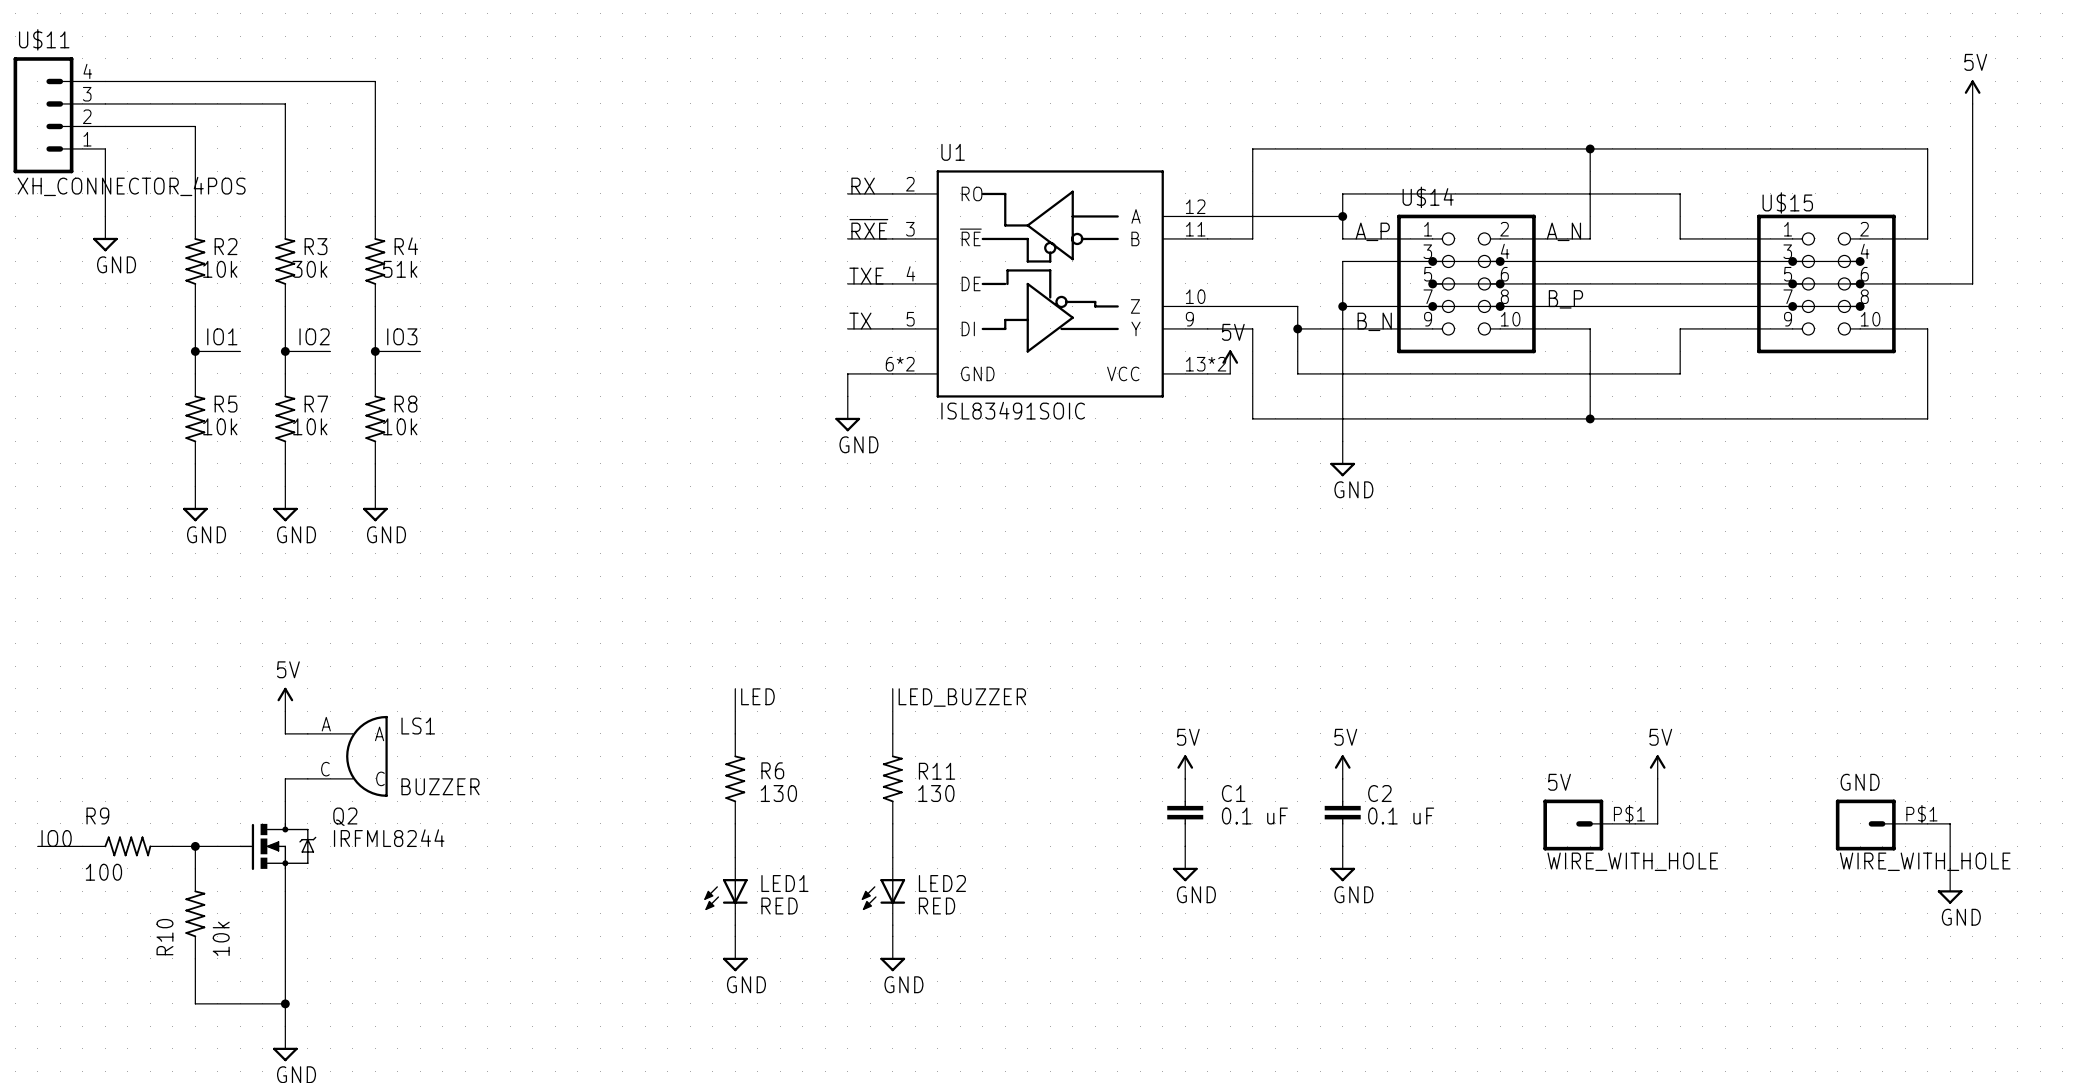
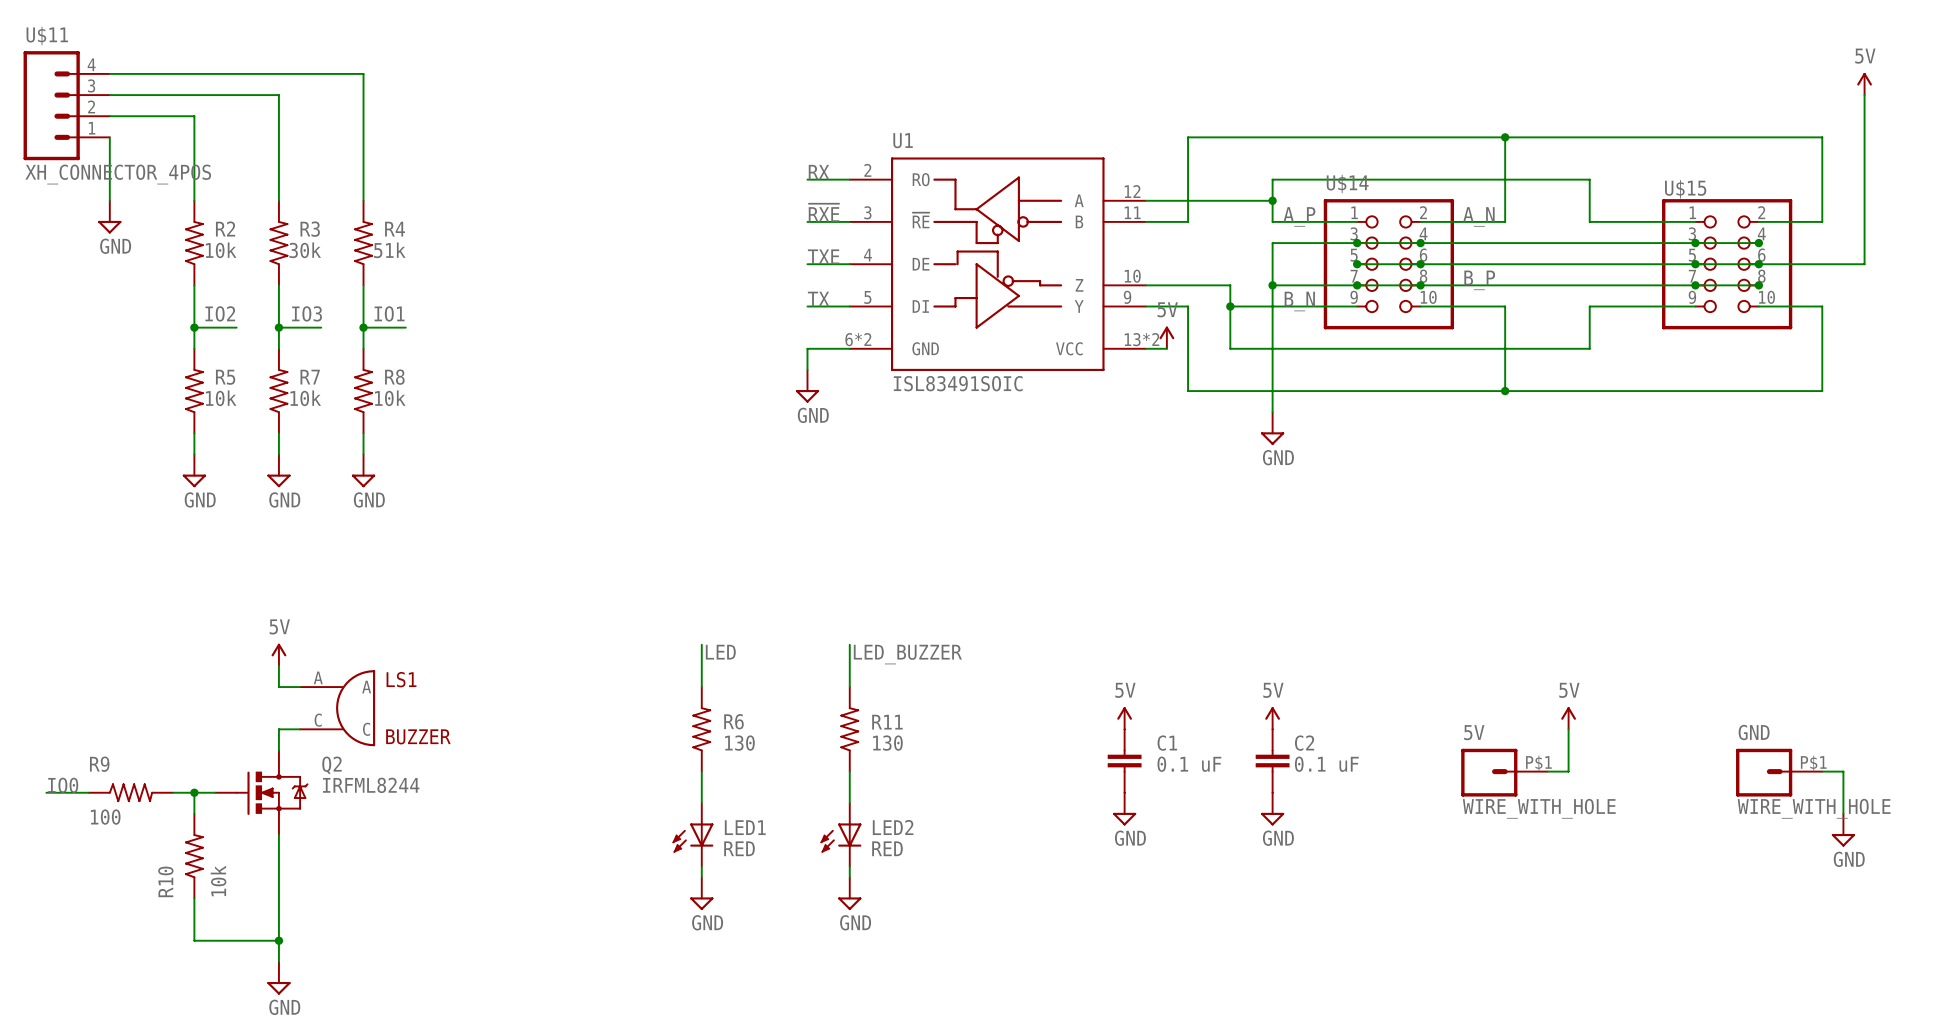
label: IO1 (222, 336) -> IO2 (220, 313)
label: IO2 (314, 336) -> IO3 (307, 313)
label: IO3 (402, 336) -> IO1 (389, 313)

